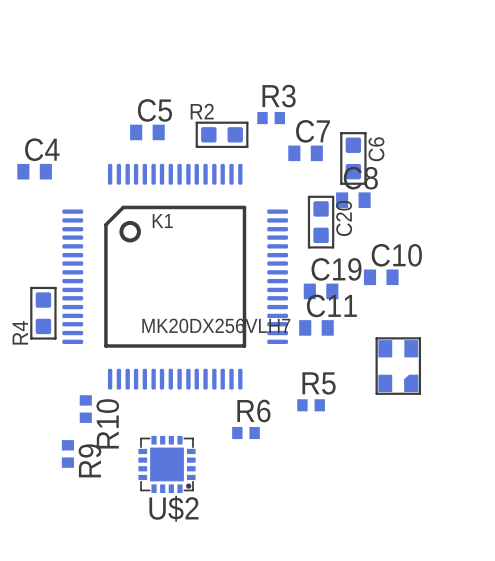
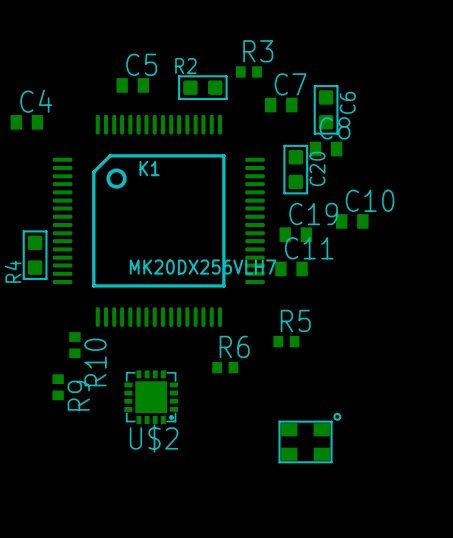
part: (398, 366) -> none
part: none -> (309, 438)

